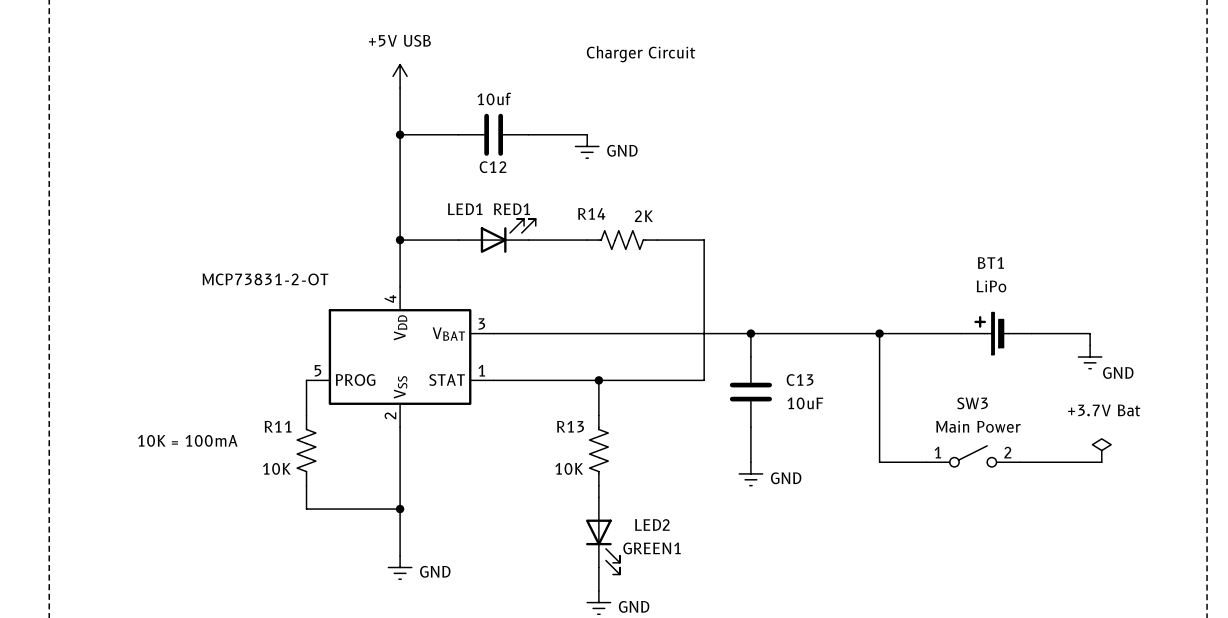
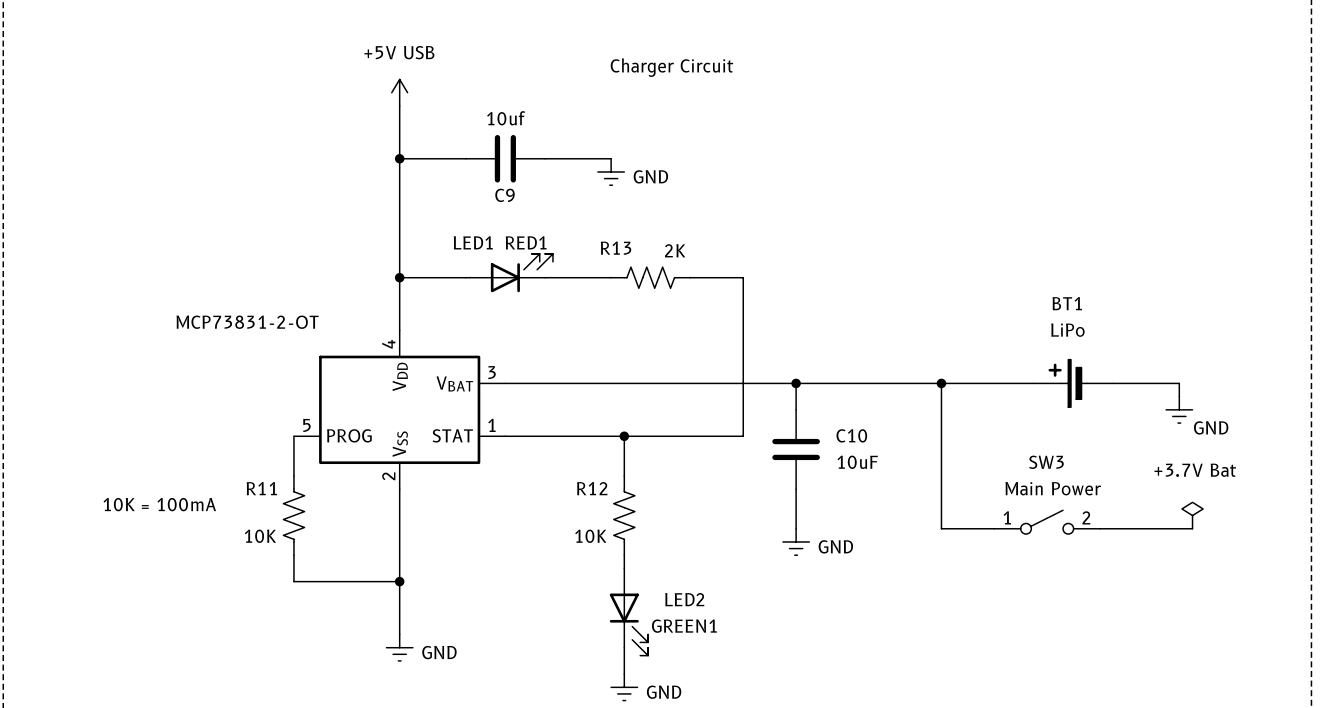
C12 name: C12 (493, 167) -> C9 (505, 195)
R14 name: R14 (591, 213) -> R13 (616, 248)
C13 name: C13 (800, 380) -> C10 (851, 435)
R13 name: R13 (570, 426) -> R12 (592, 488)

